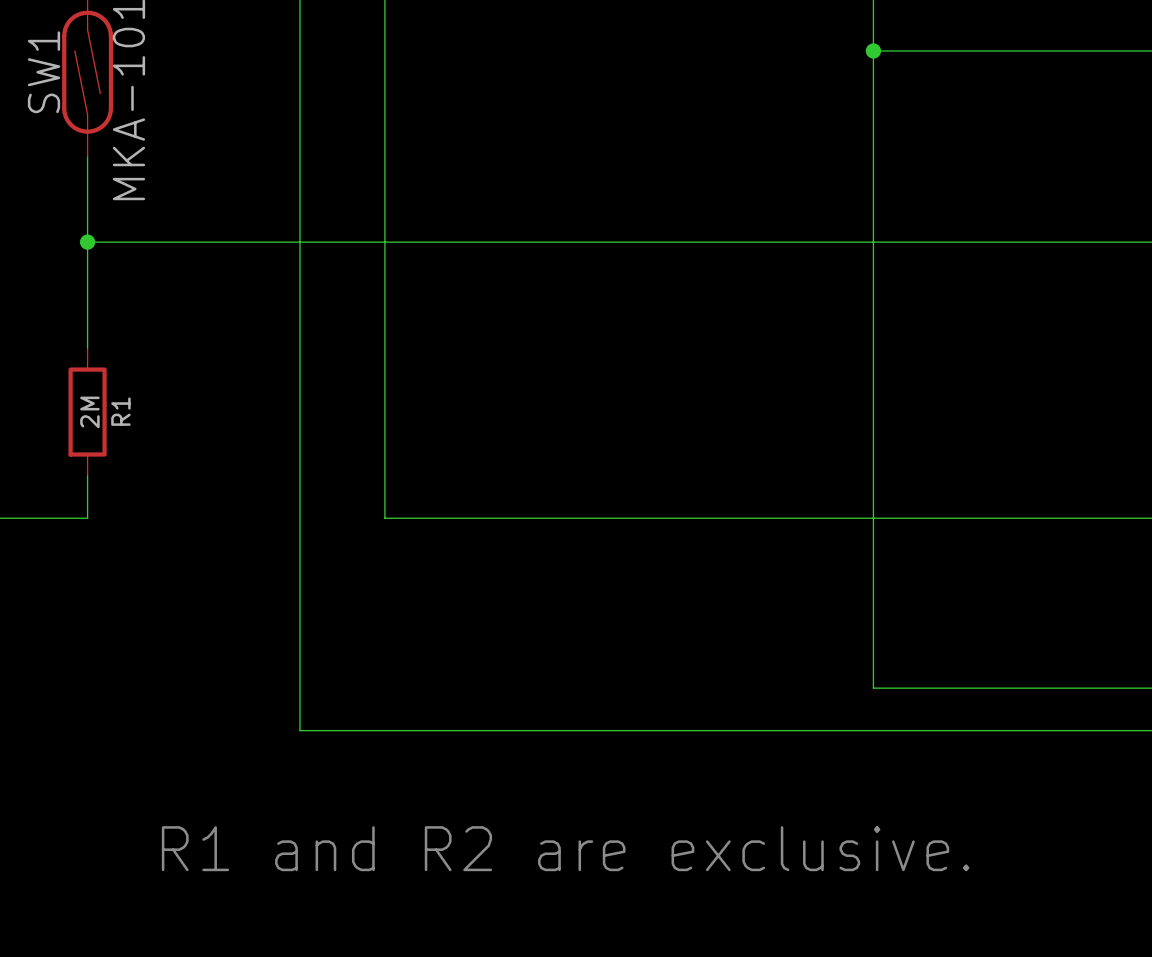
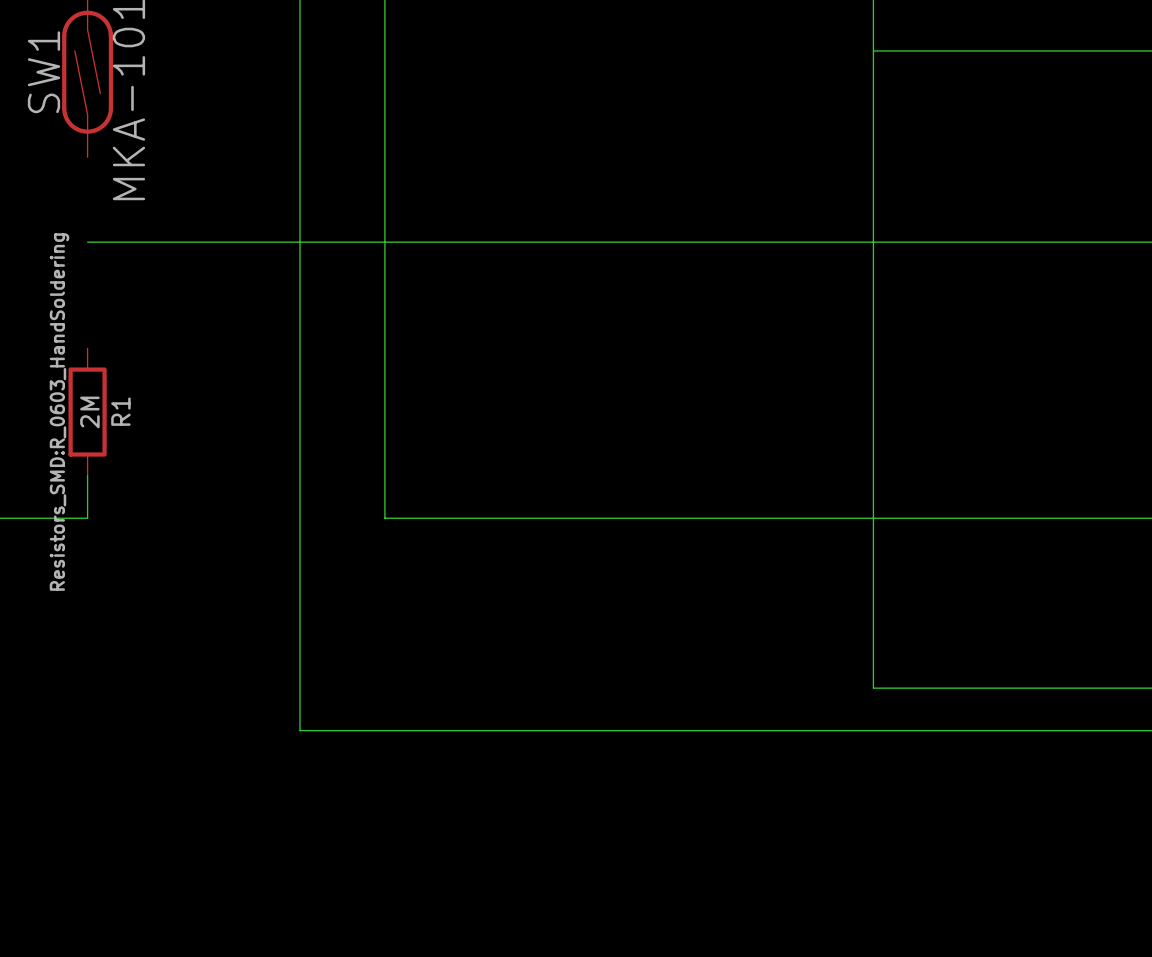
junction: (873, 50) -> none
wire: (87, 157) (87, 348) -> none
junction: (87, 242) -> none
R1 text: none -> Resistors_SMD:R_0603_HandSoldering (59, 412)
text: R1 and R2 are exclusive. (565, 848) -> none

